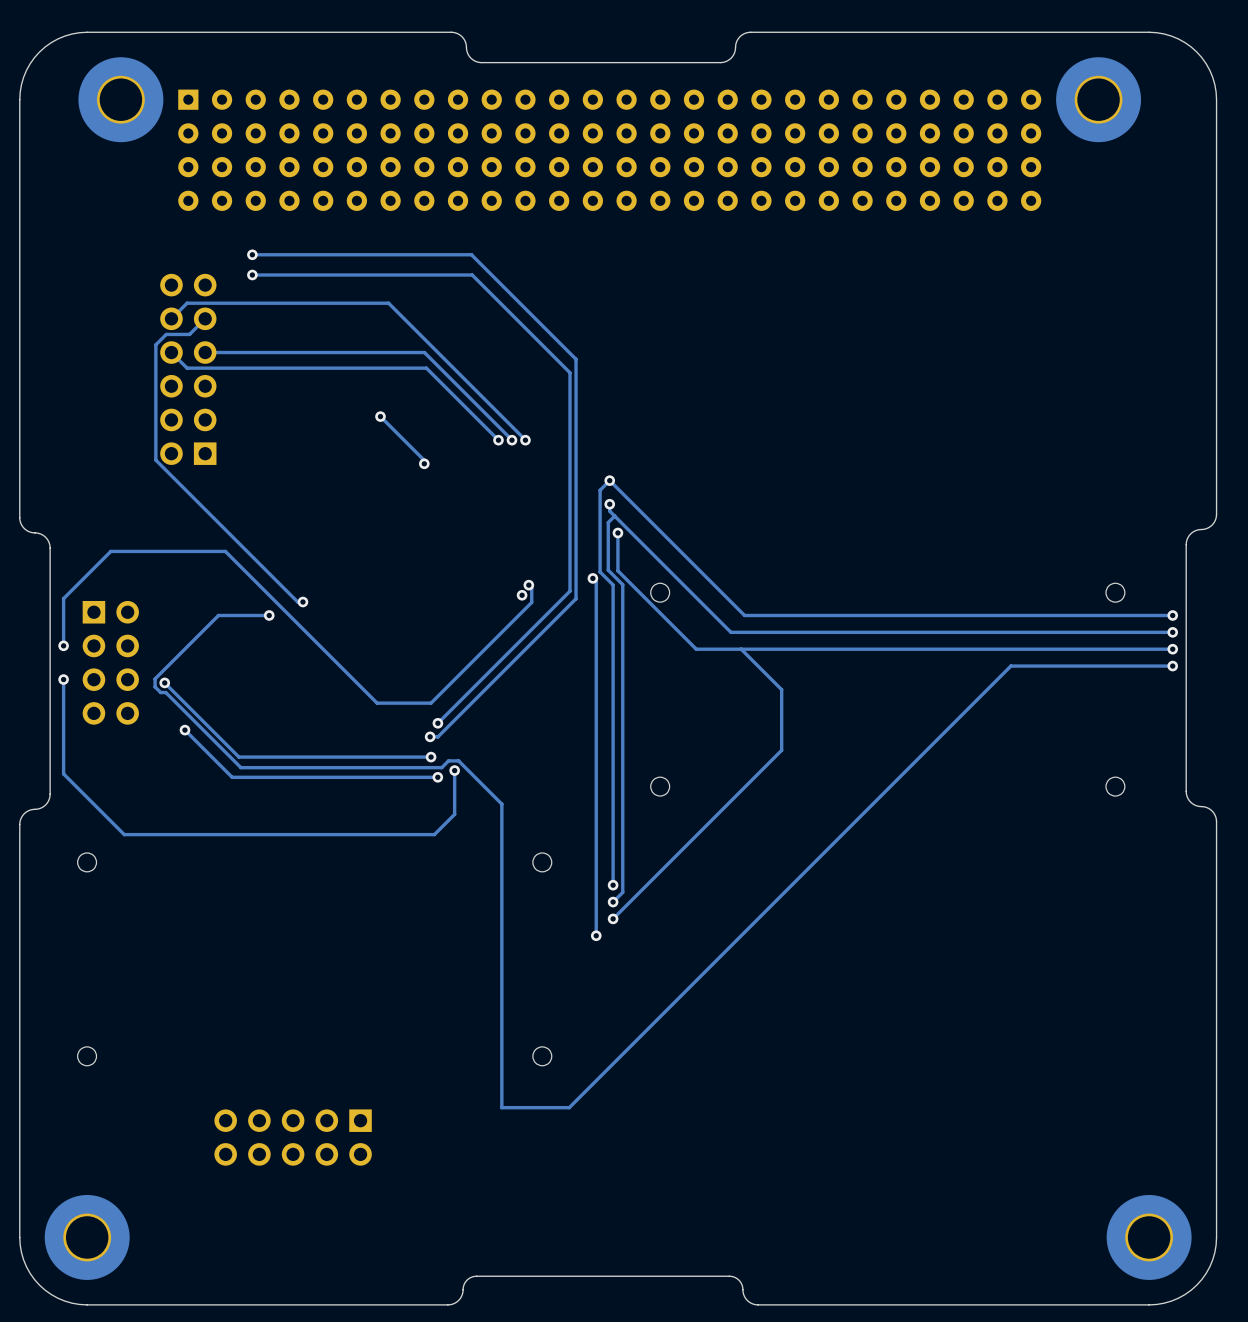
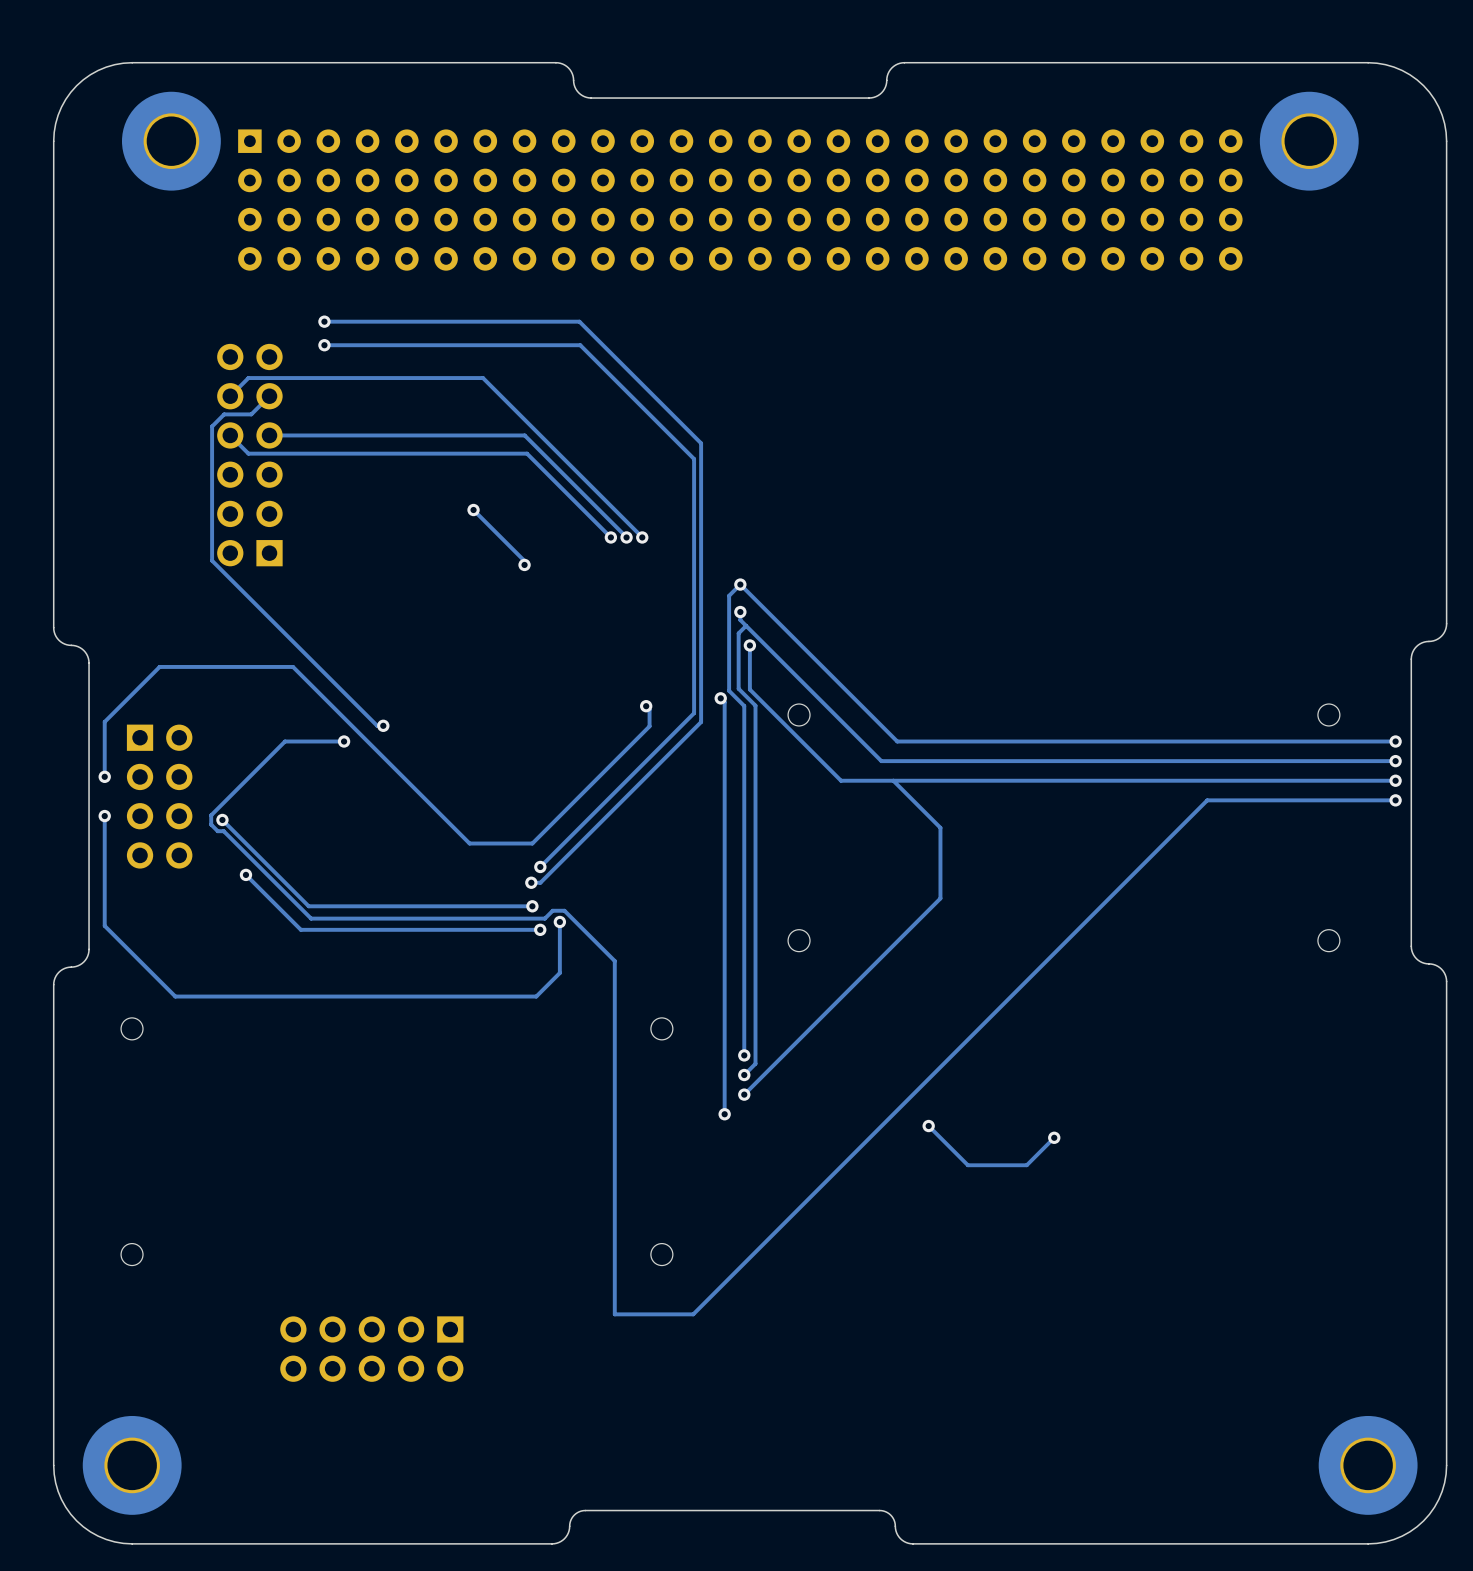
via: (522, 595) -> none
track: none -> (928, 1126) (967, 1165) (1026, 1165) (1054, 1137)
via: none -> (928, 1126)
via: none -> (1054, 1137)

